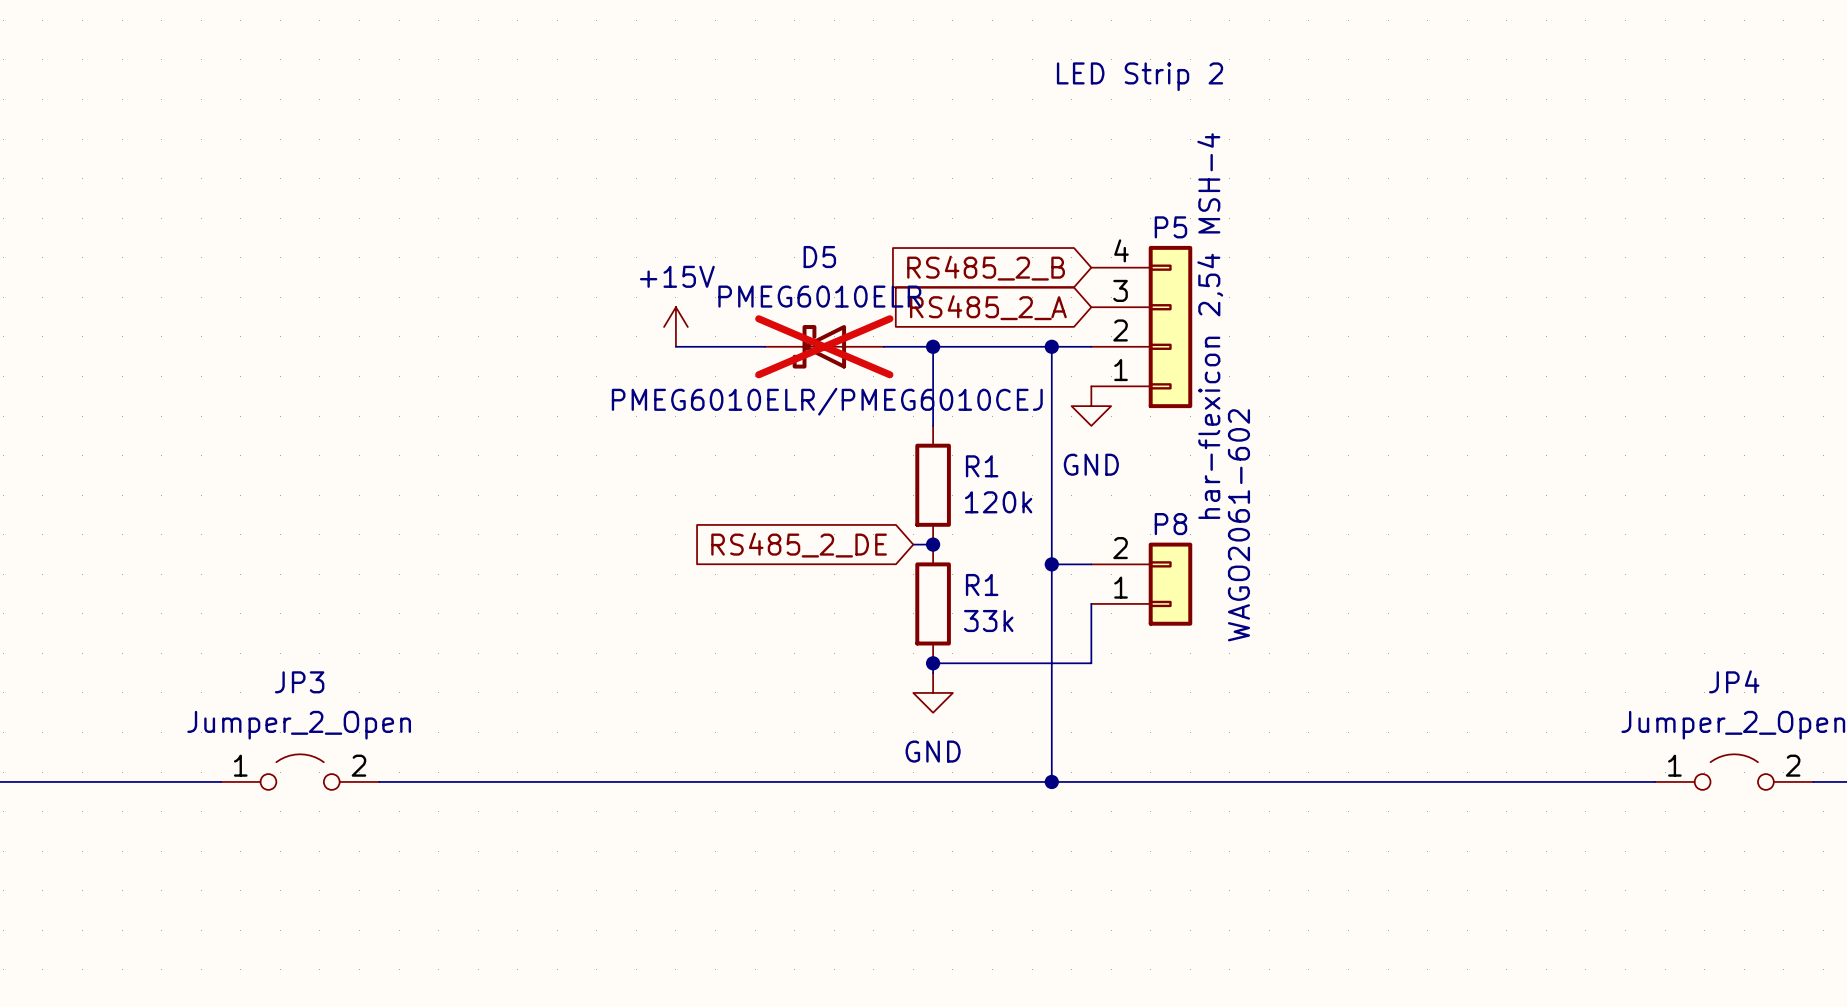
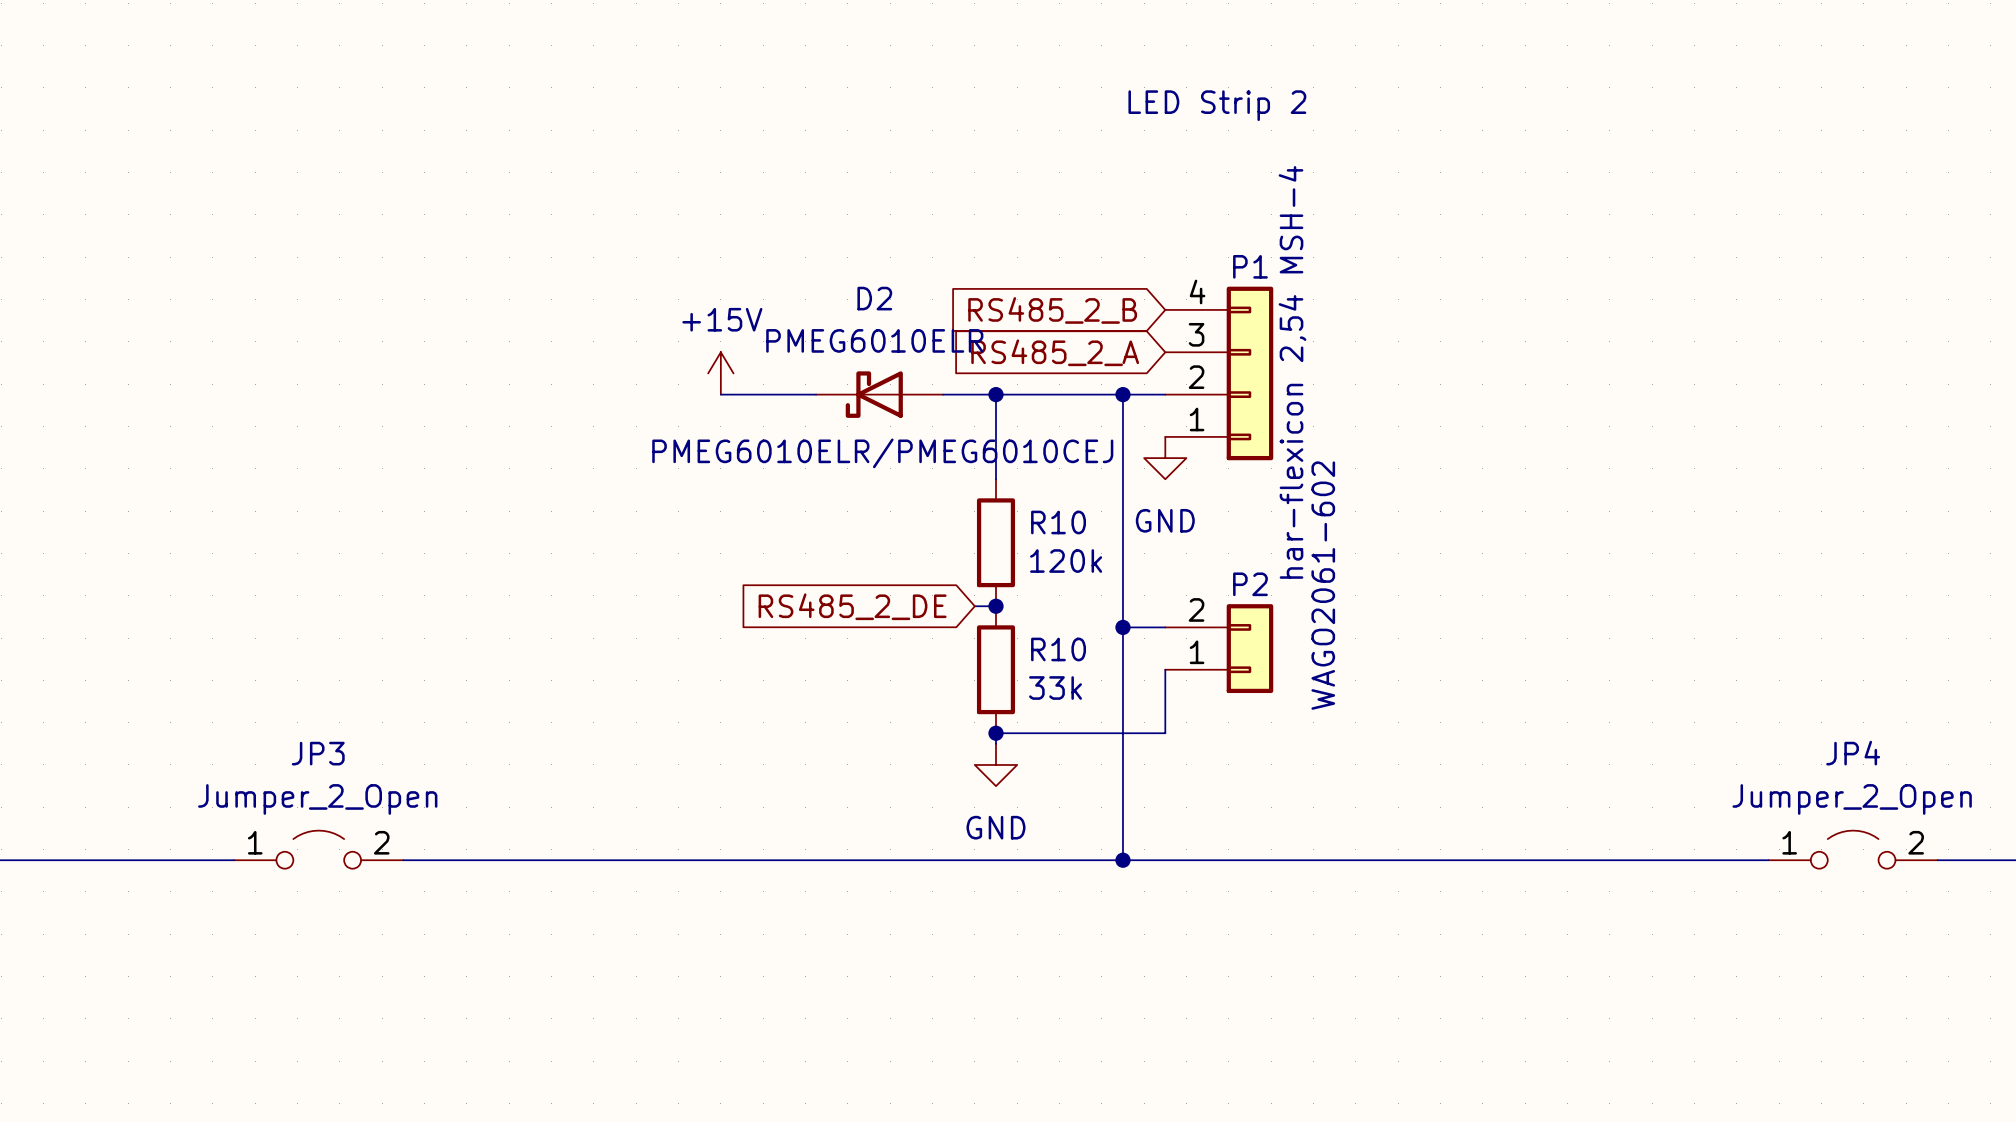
P5 name: P5 (1170, 227) -> P1 (1250, 266)
D5 name: D5 (819, 257) -> D2 (874, 298)
D5 do-not-place cross: (824, 346) -> none
R1 name: R1 (982, 466) -> R10 (1058, 522)
P8 name: P8 (1170, 524) -> P2 (1250, 584)
R1 name: R1 (982, 585) -> R10 (1058, 649)

